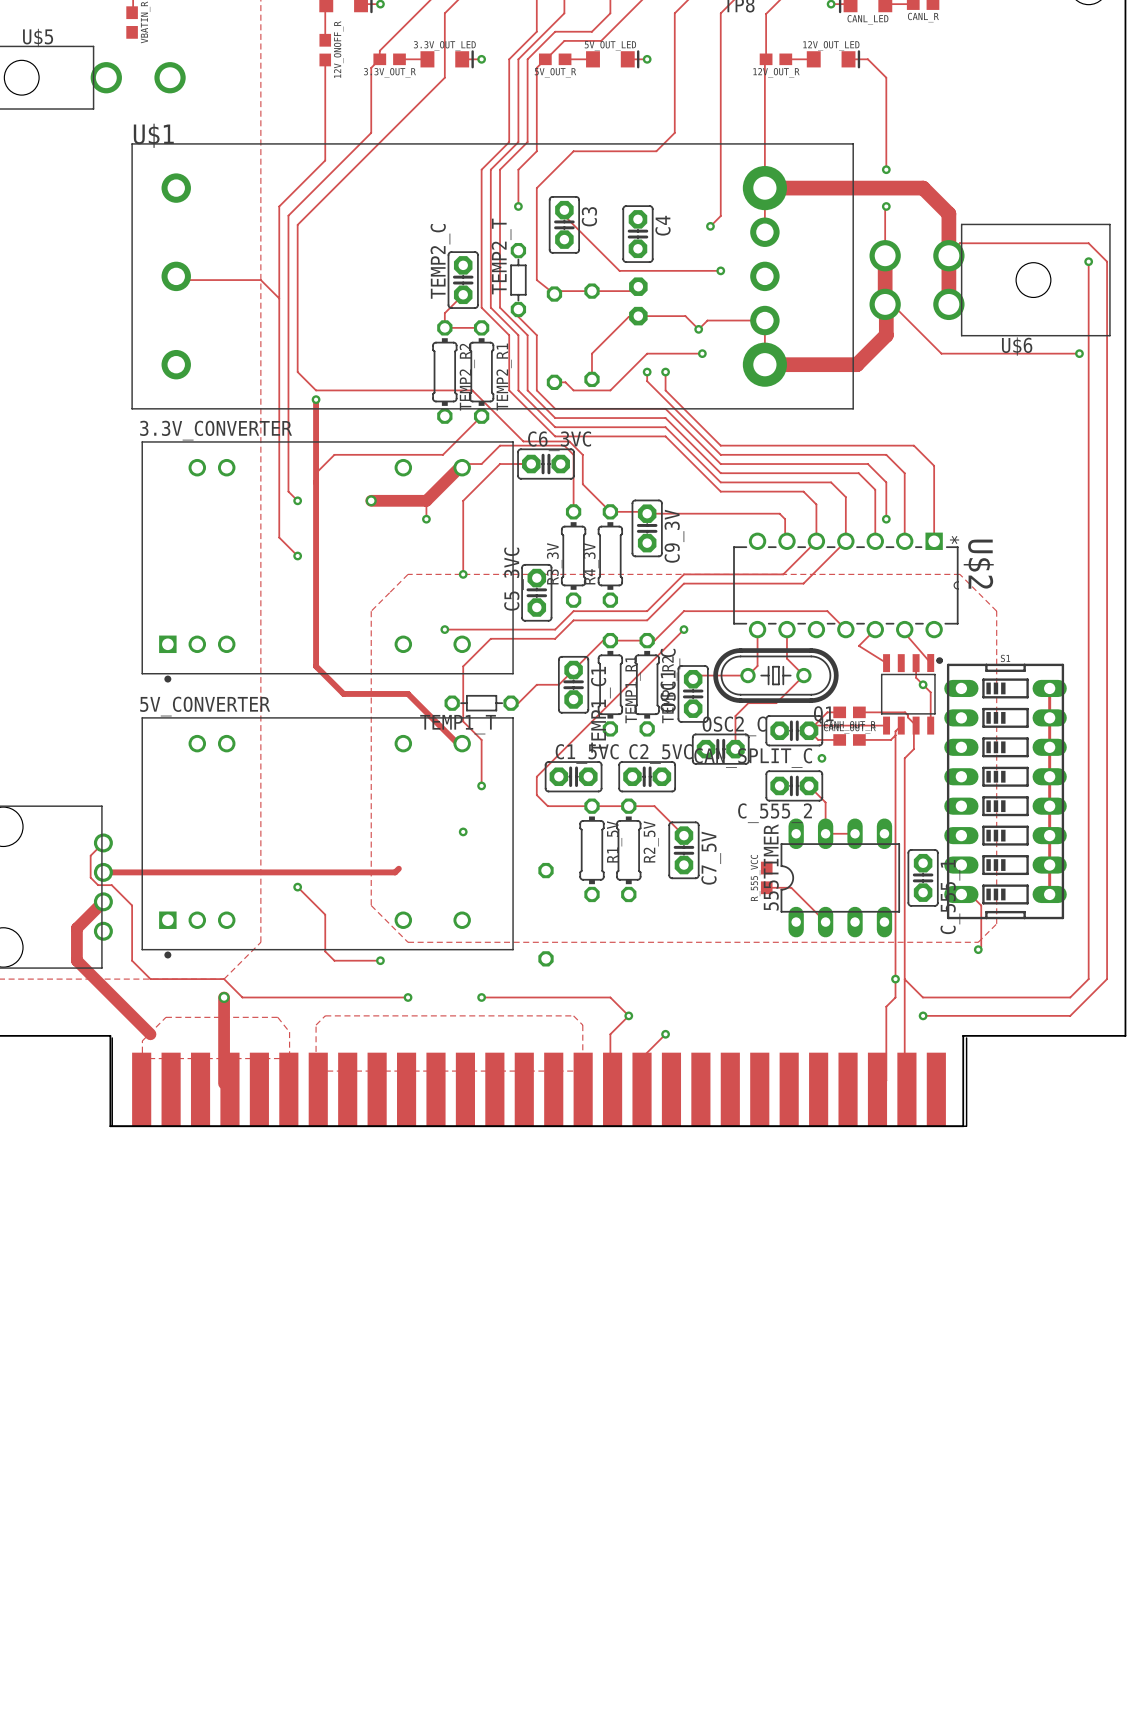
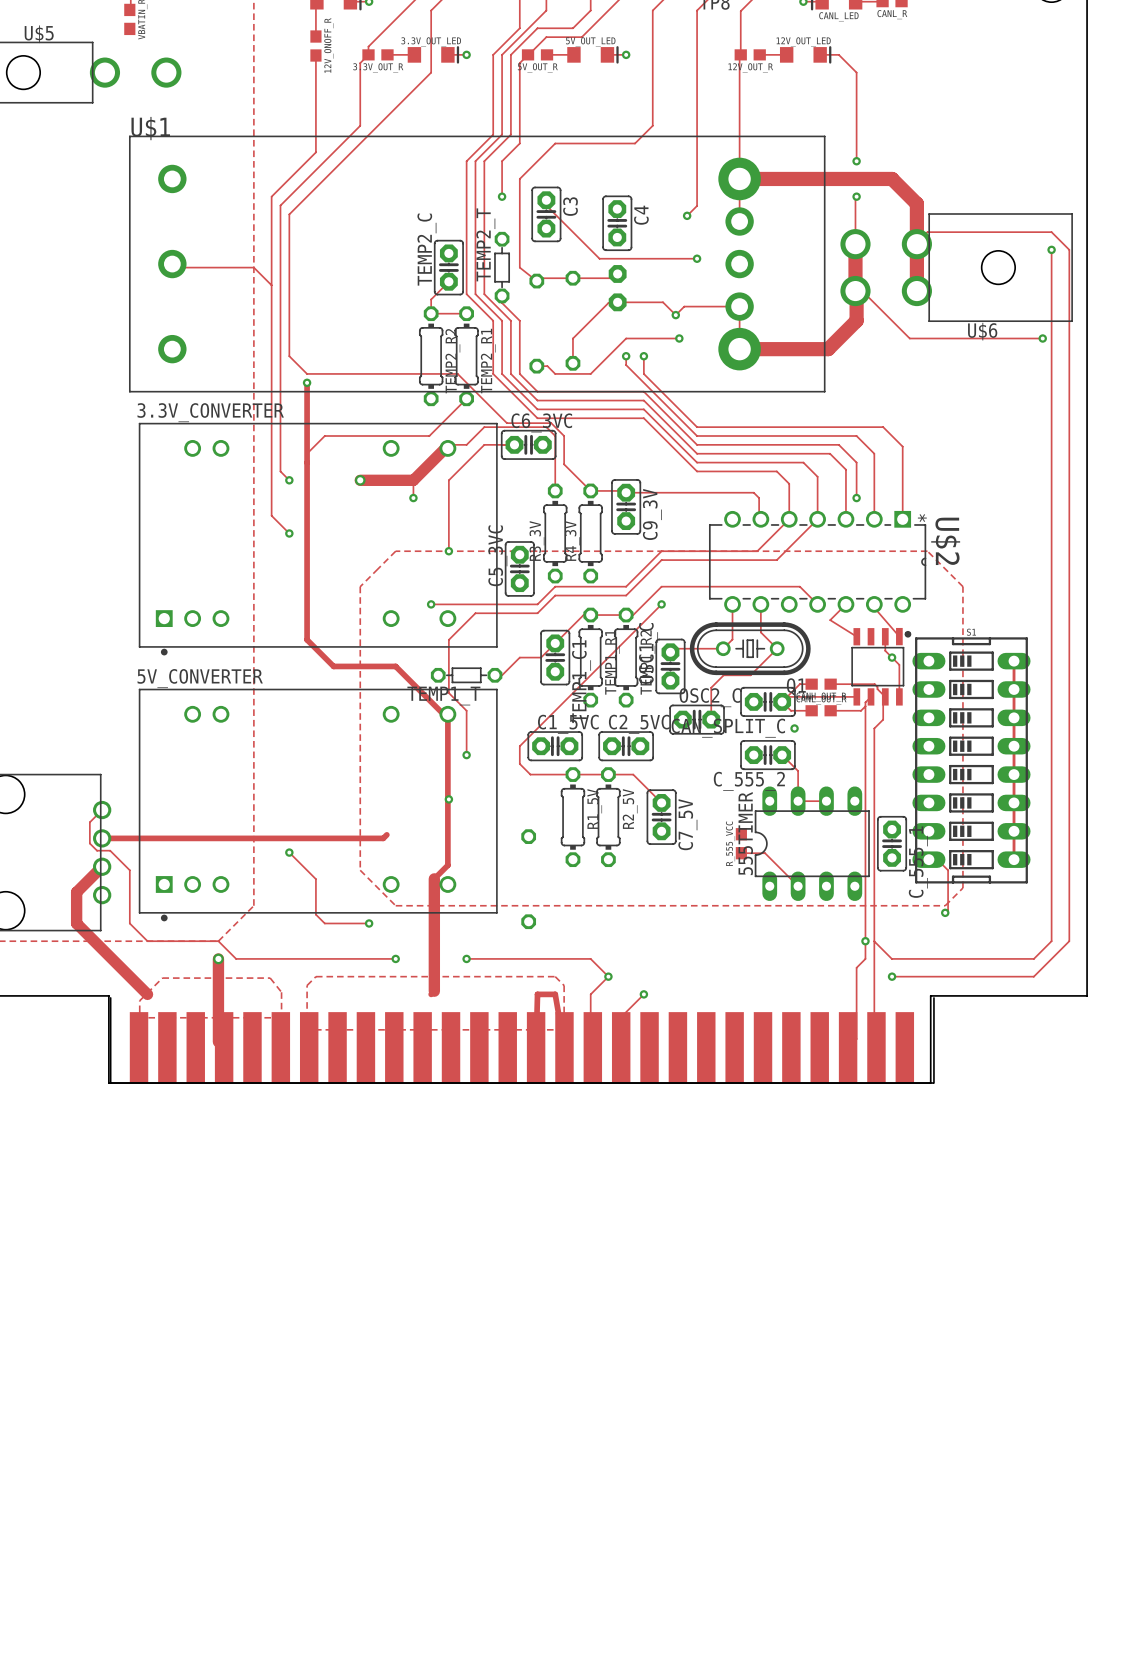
track: none -> (447, 714) (447, 865) (434, 878) (434, 991) (431, 994)
track: none -> (536, 1047) (537, 994) (555, 994) (564, 1047)

